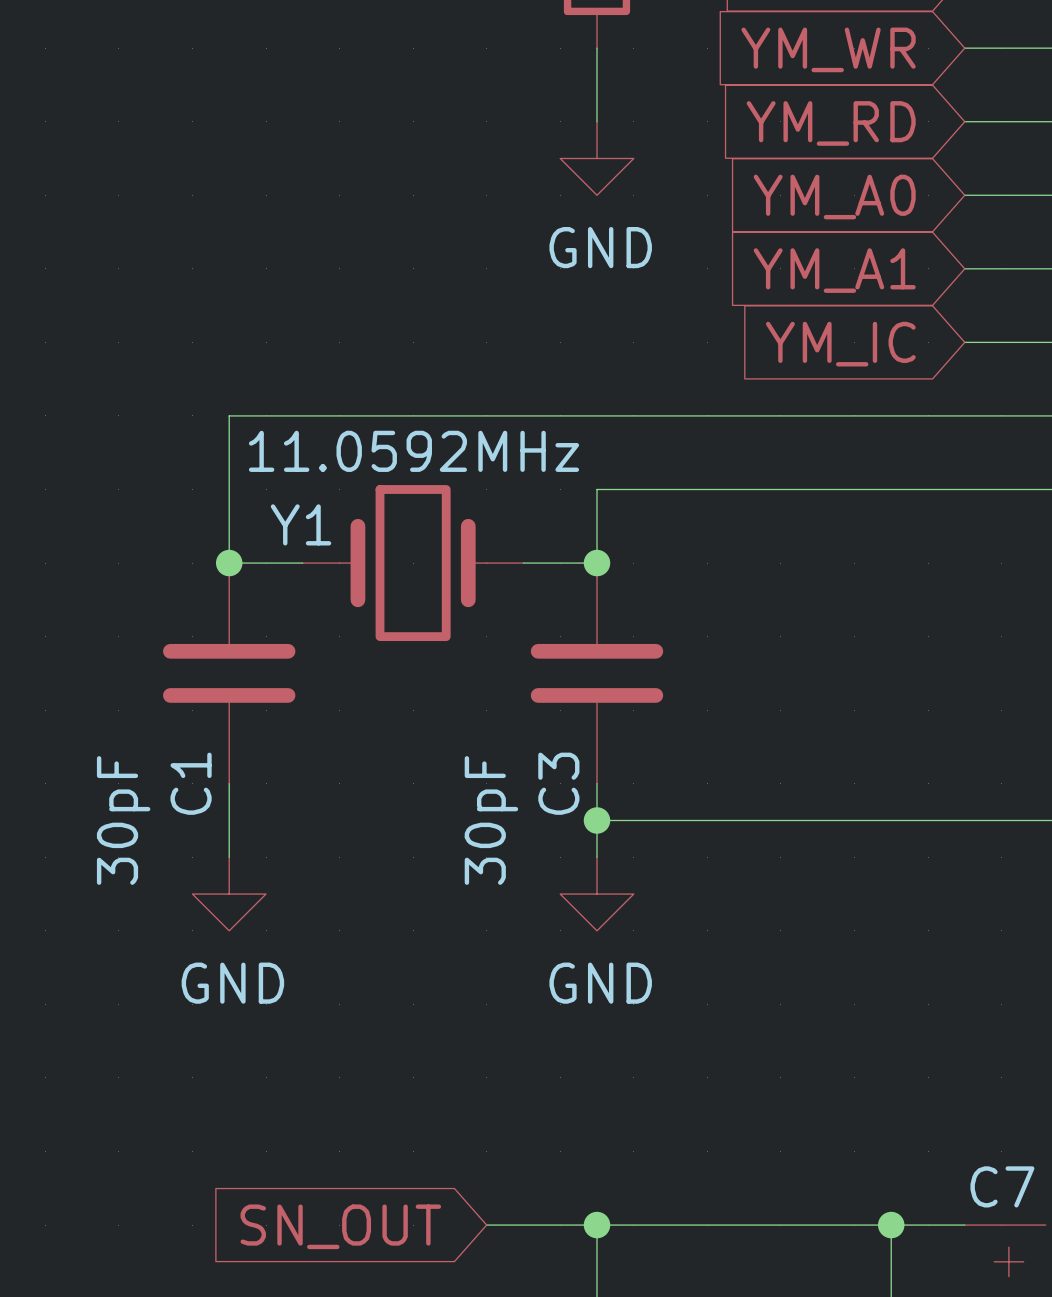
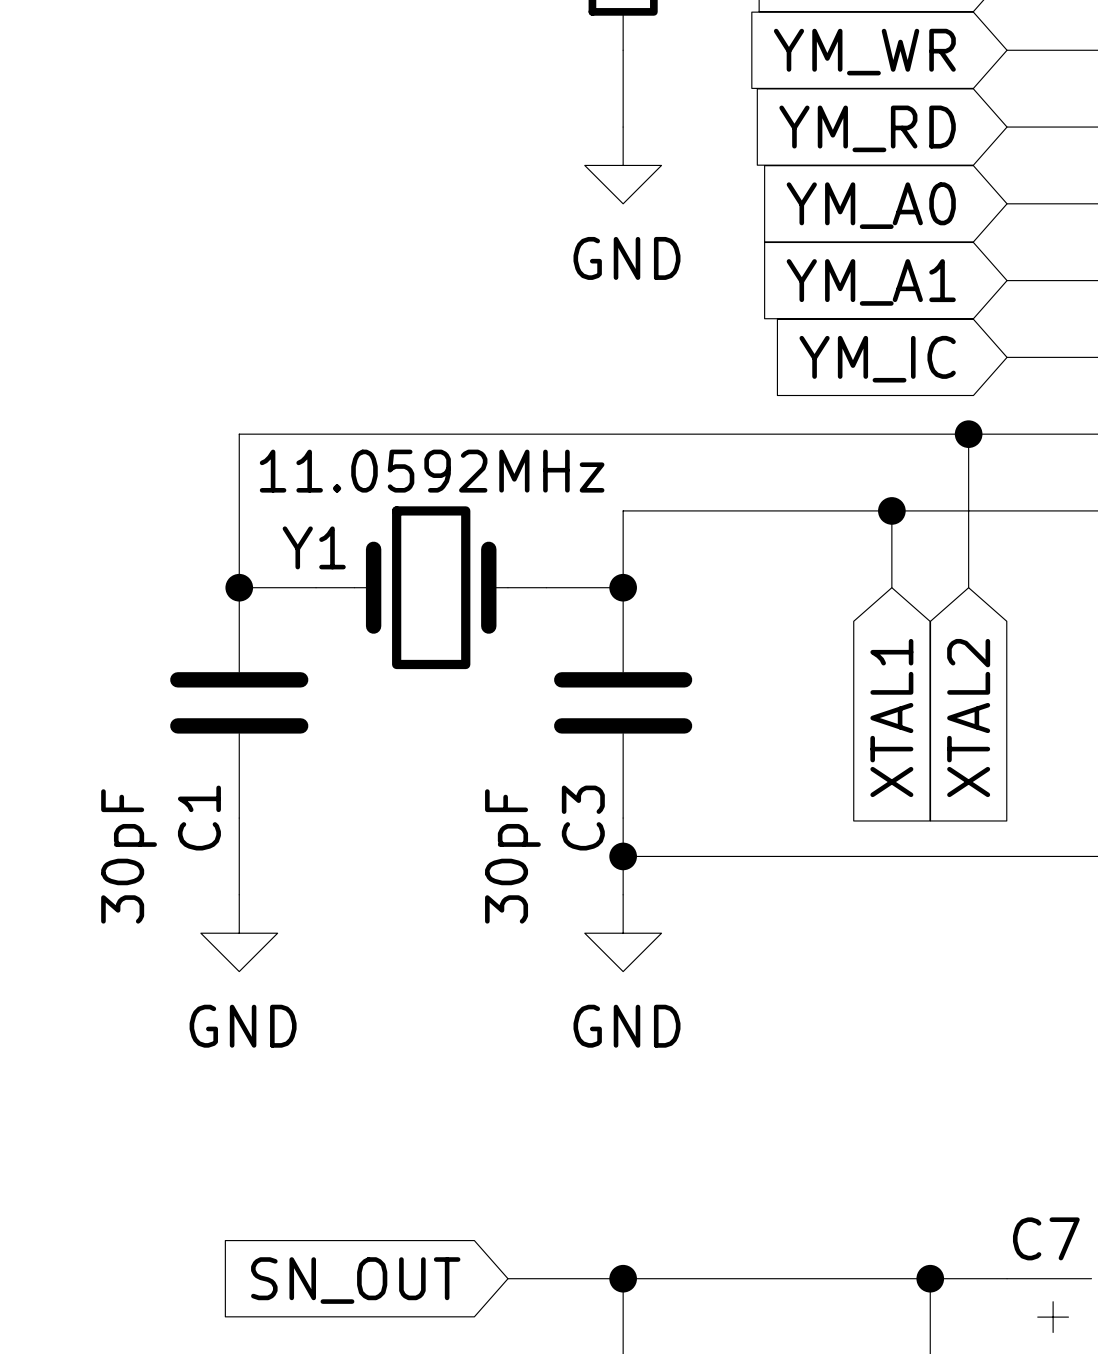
wire: none -> (968, 434) (968, 587)
junction: none -> (968, 434)
wire: none -> (891, 510) (891, 587)
junction: none -> (891, 510)
global label: none -> XTAL1 (891, 718)
global label: none -> XTAL2 (968, 718)

